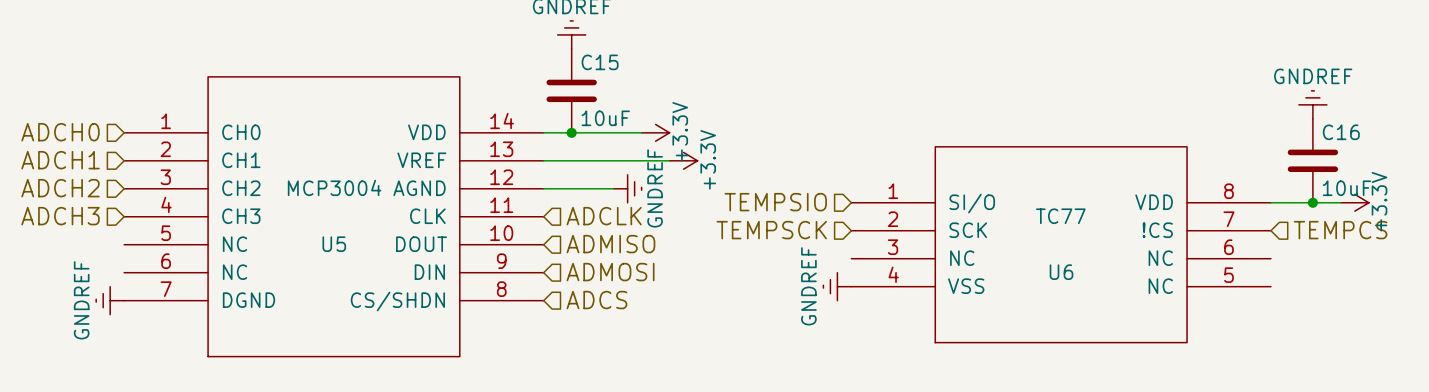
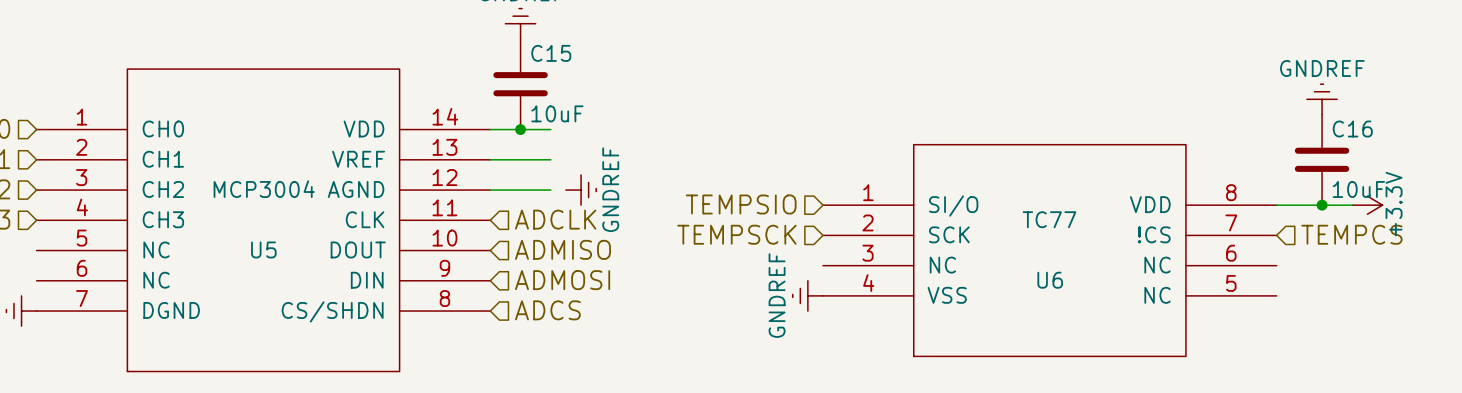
wire: (599, 132) (641, 132) -> none
power symbol: +3.3V (655, 132) -> none
wire: (599, 160) (669, 160) -> none
power symbol: +3.3V (683, 160) -> none
wire: (599, 188) (613, 188) -> none

